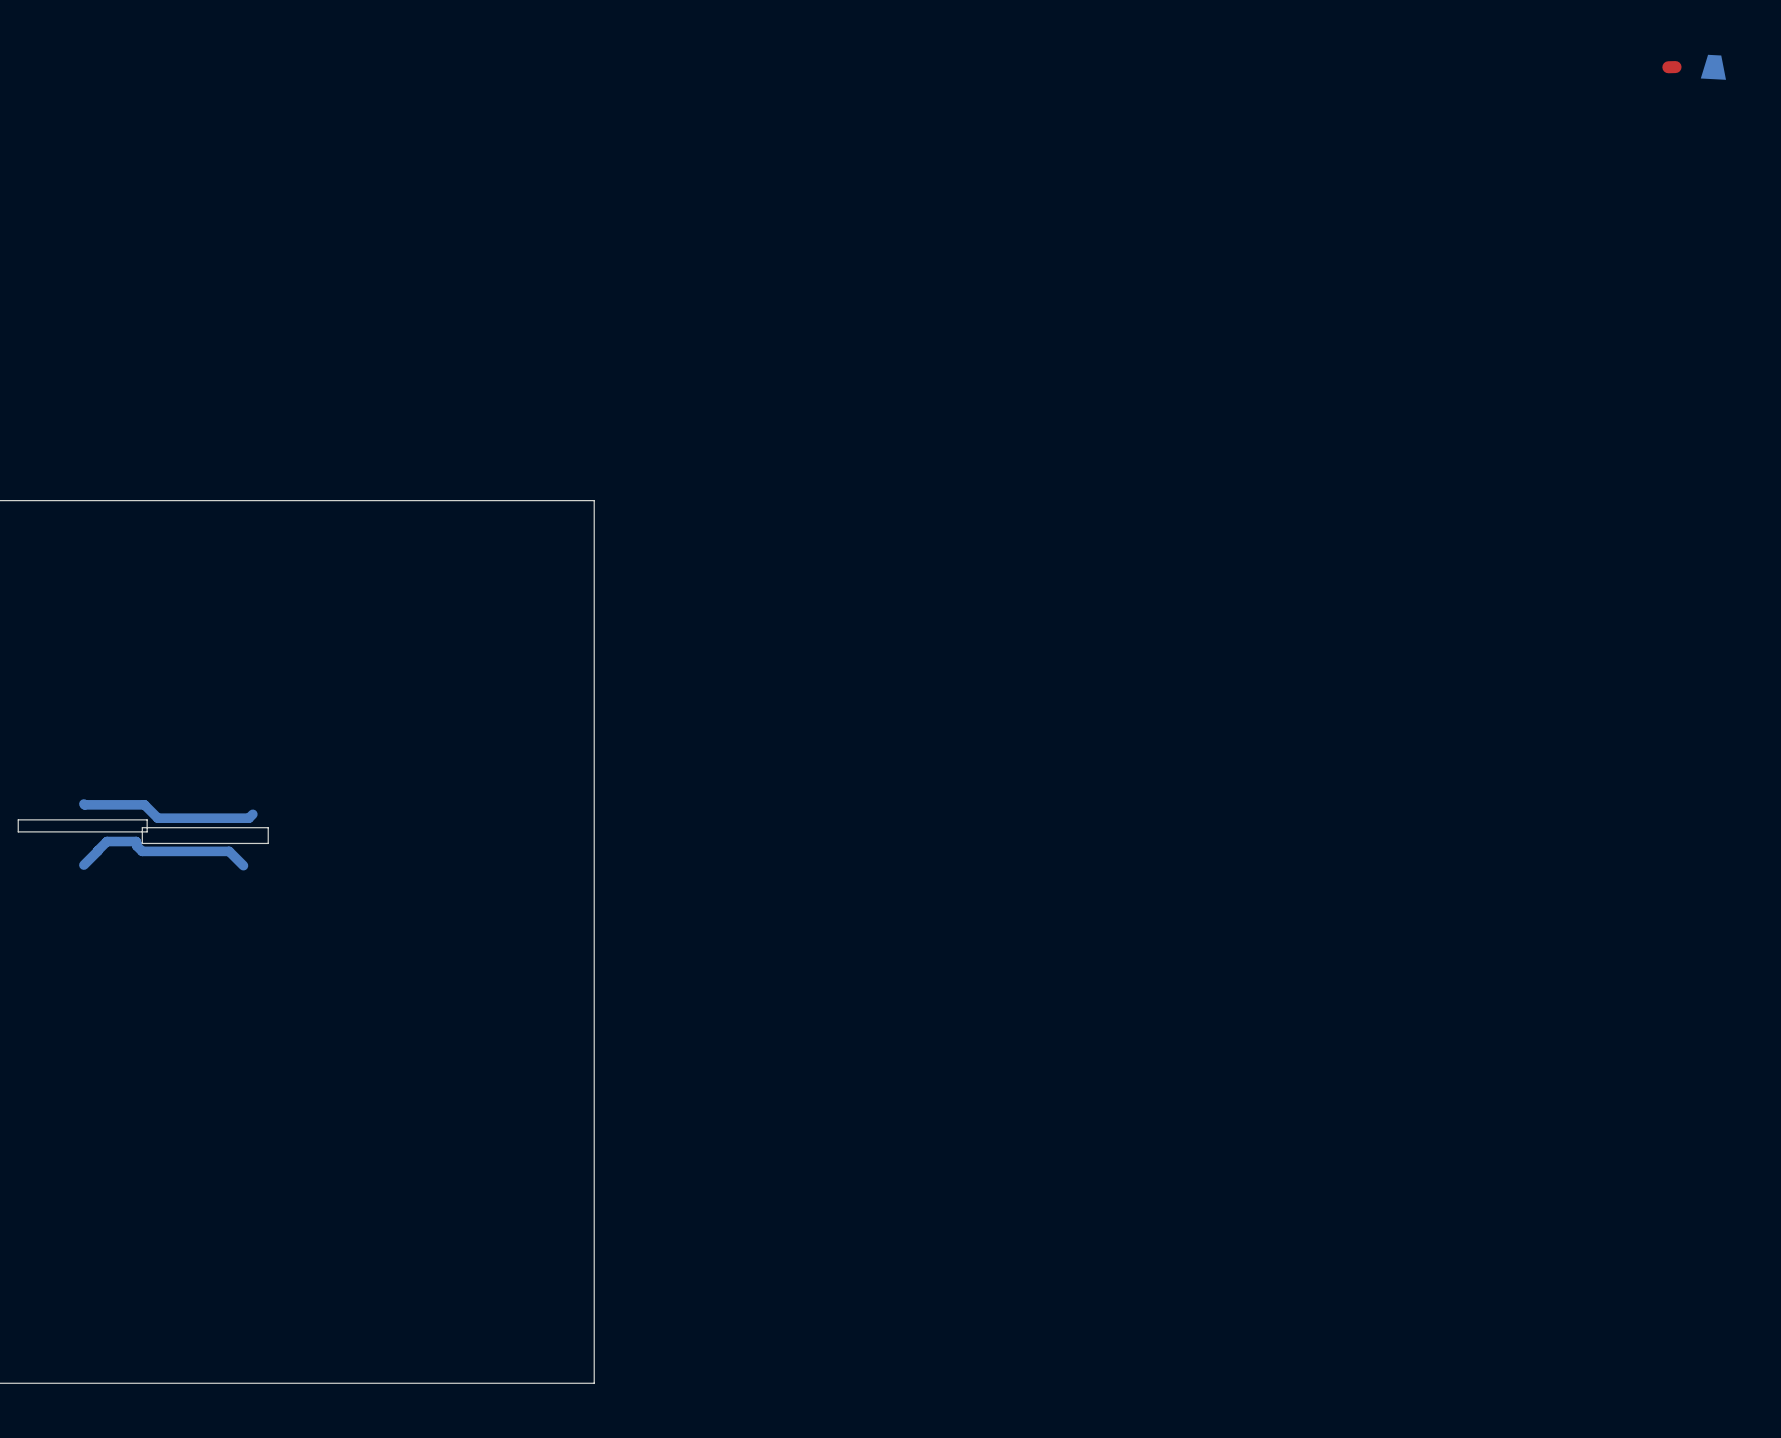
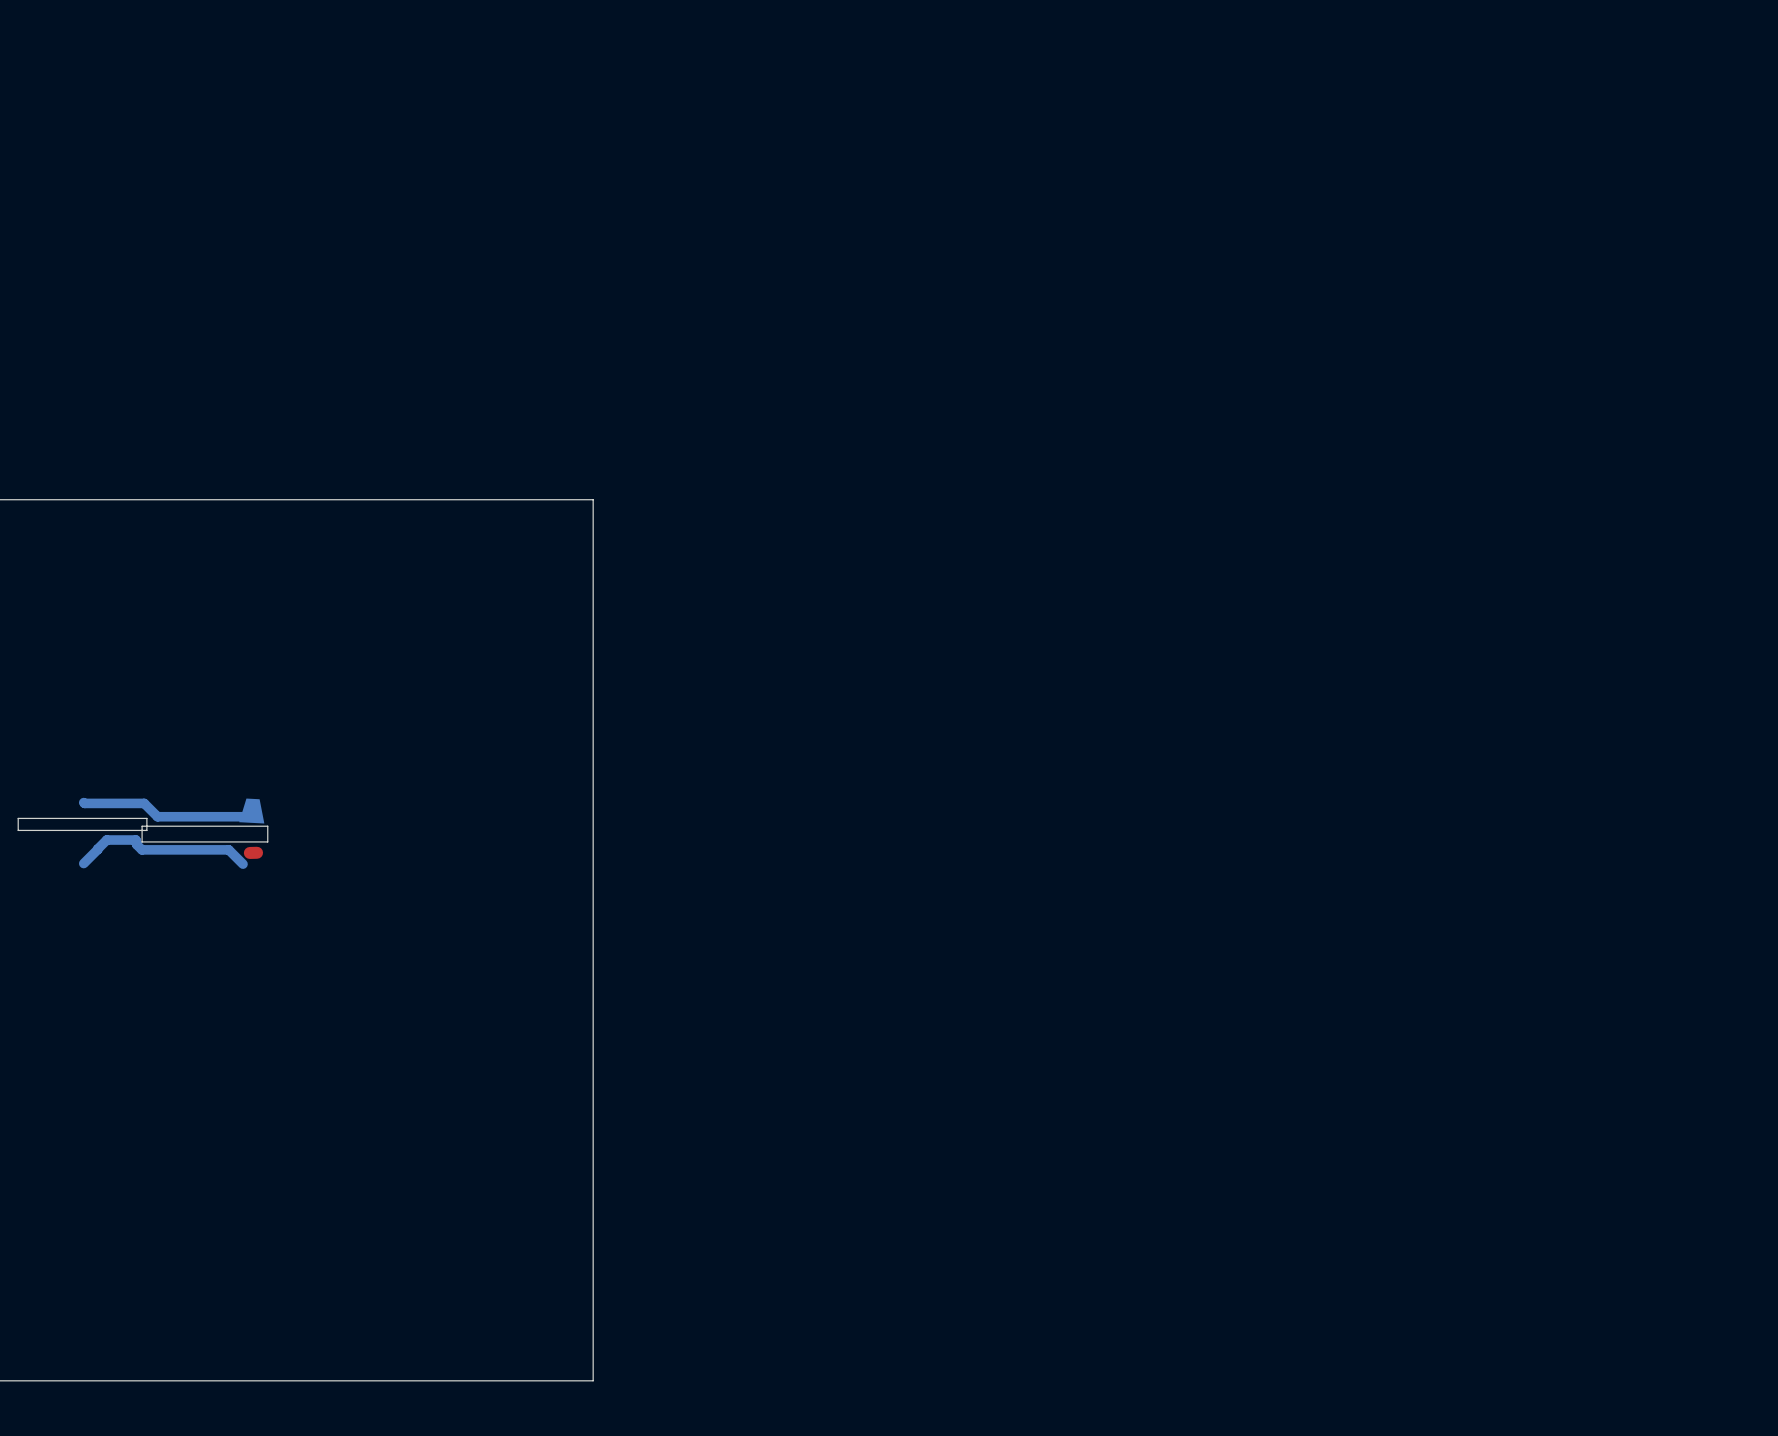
part: (1694, 67) -> none
part: none -> (251, 828)

